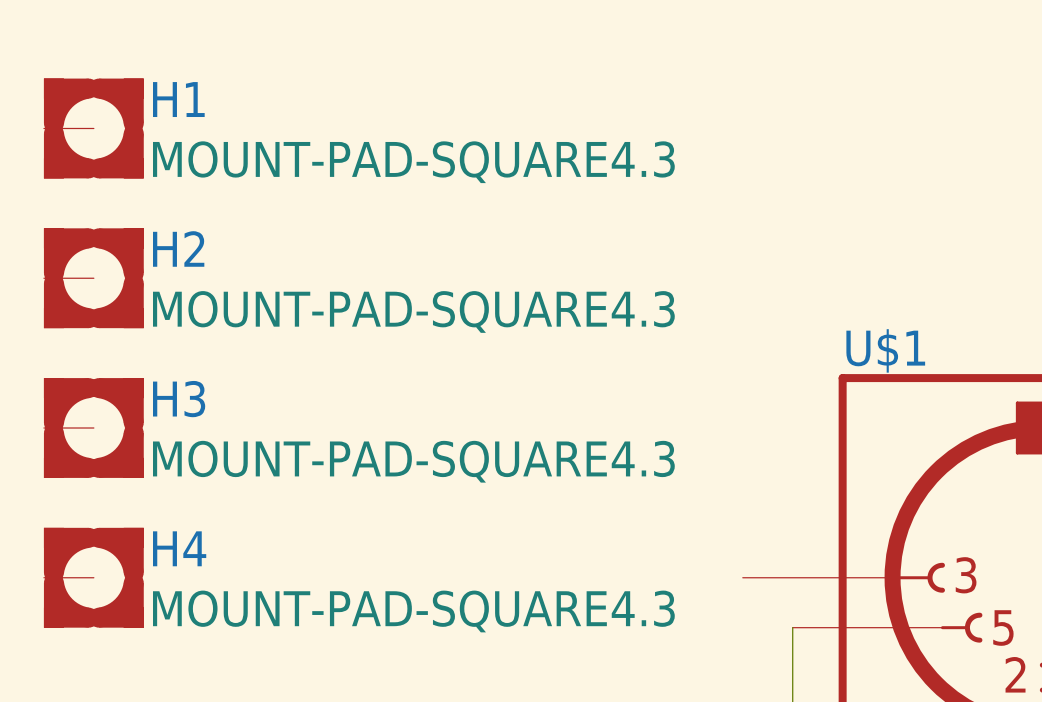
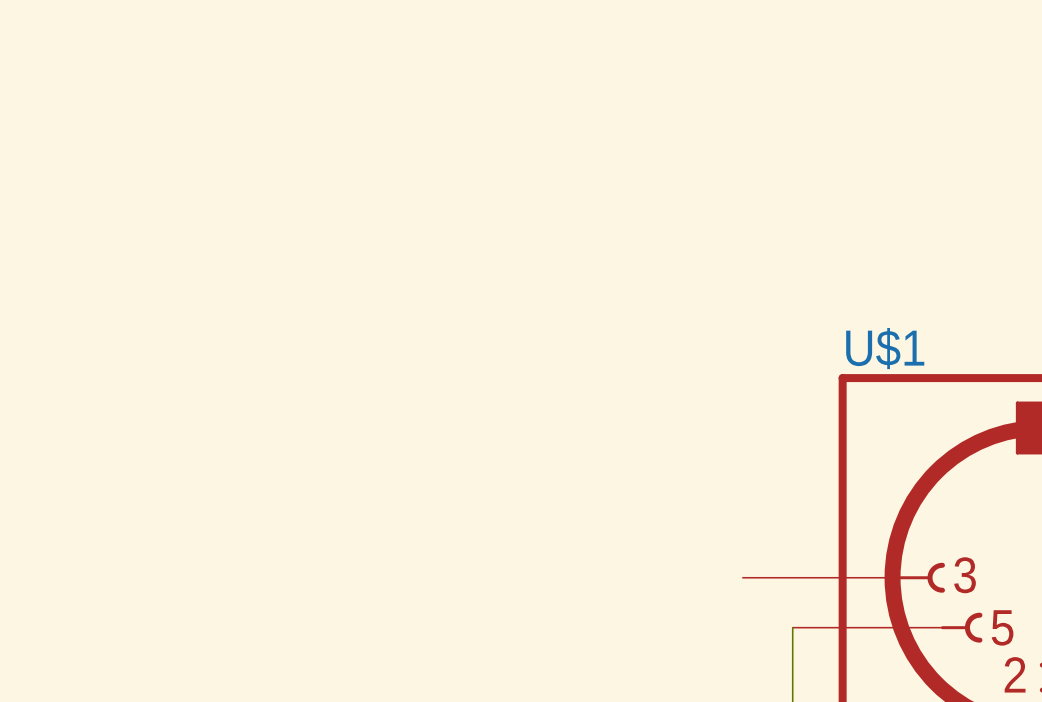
H1: MOUNT-PAD-SQUARE4.3 (93, 128) -> none
H2: MOUNT-PAD-SQUARE4.3 (93, 278) -> none
H3: MOUNT-PAD-SQUARE4.3 (93, 428) -> none
H4: MOUNT-PAD-SQUARE4.3 (93, 577) -> none

